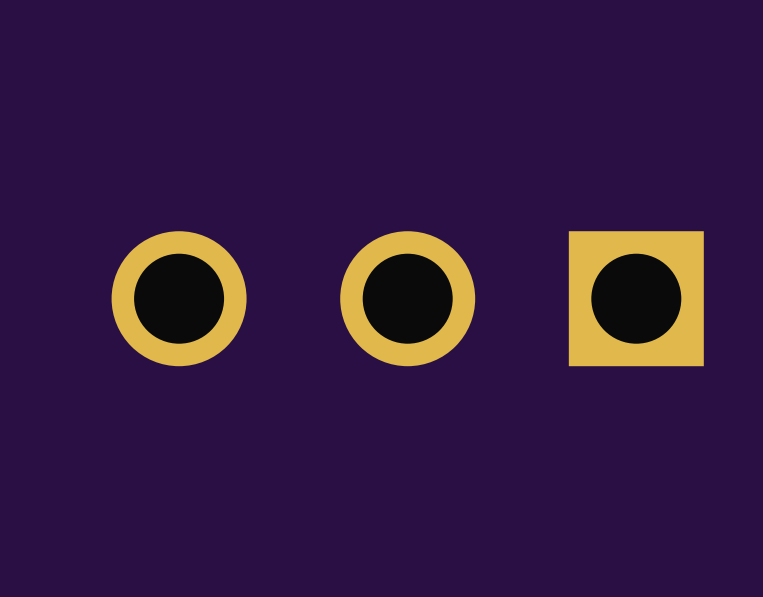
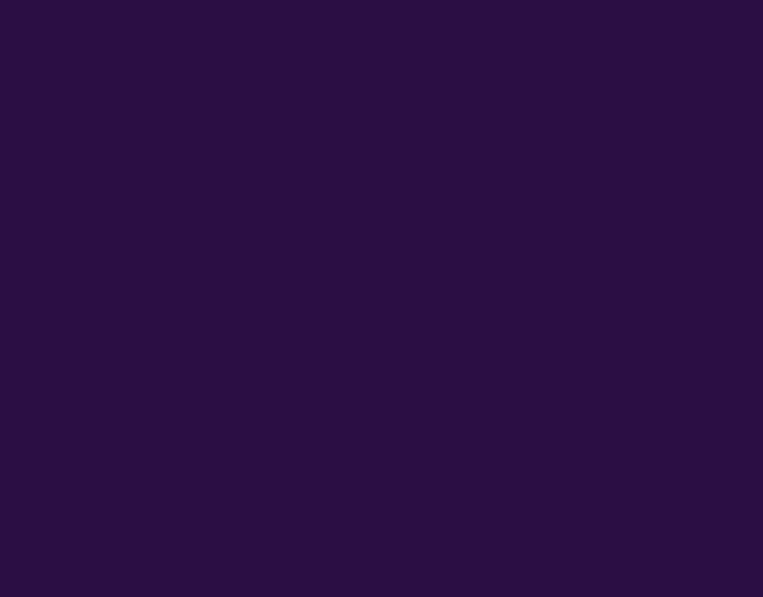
part: (407, 298) -> none

